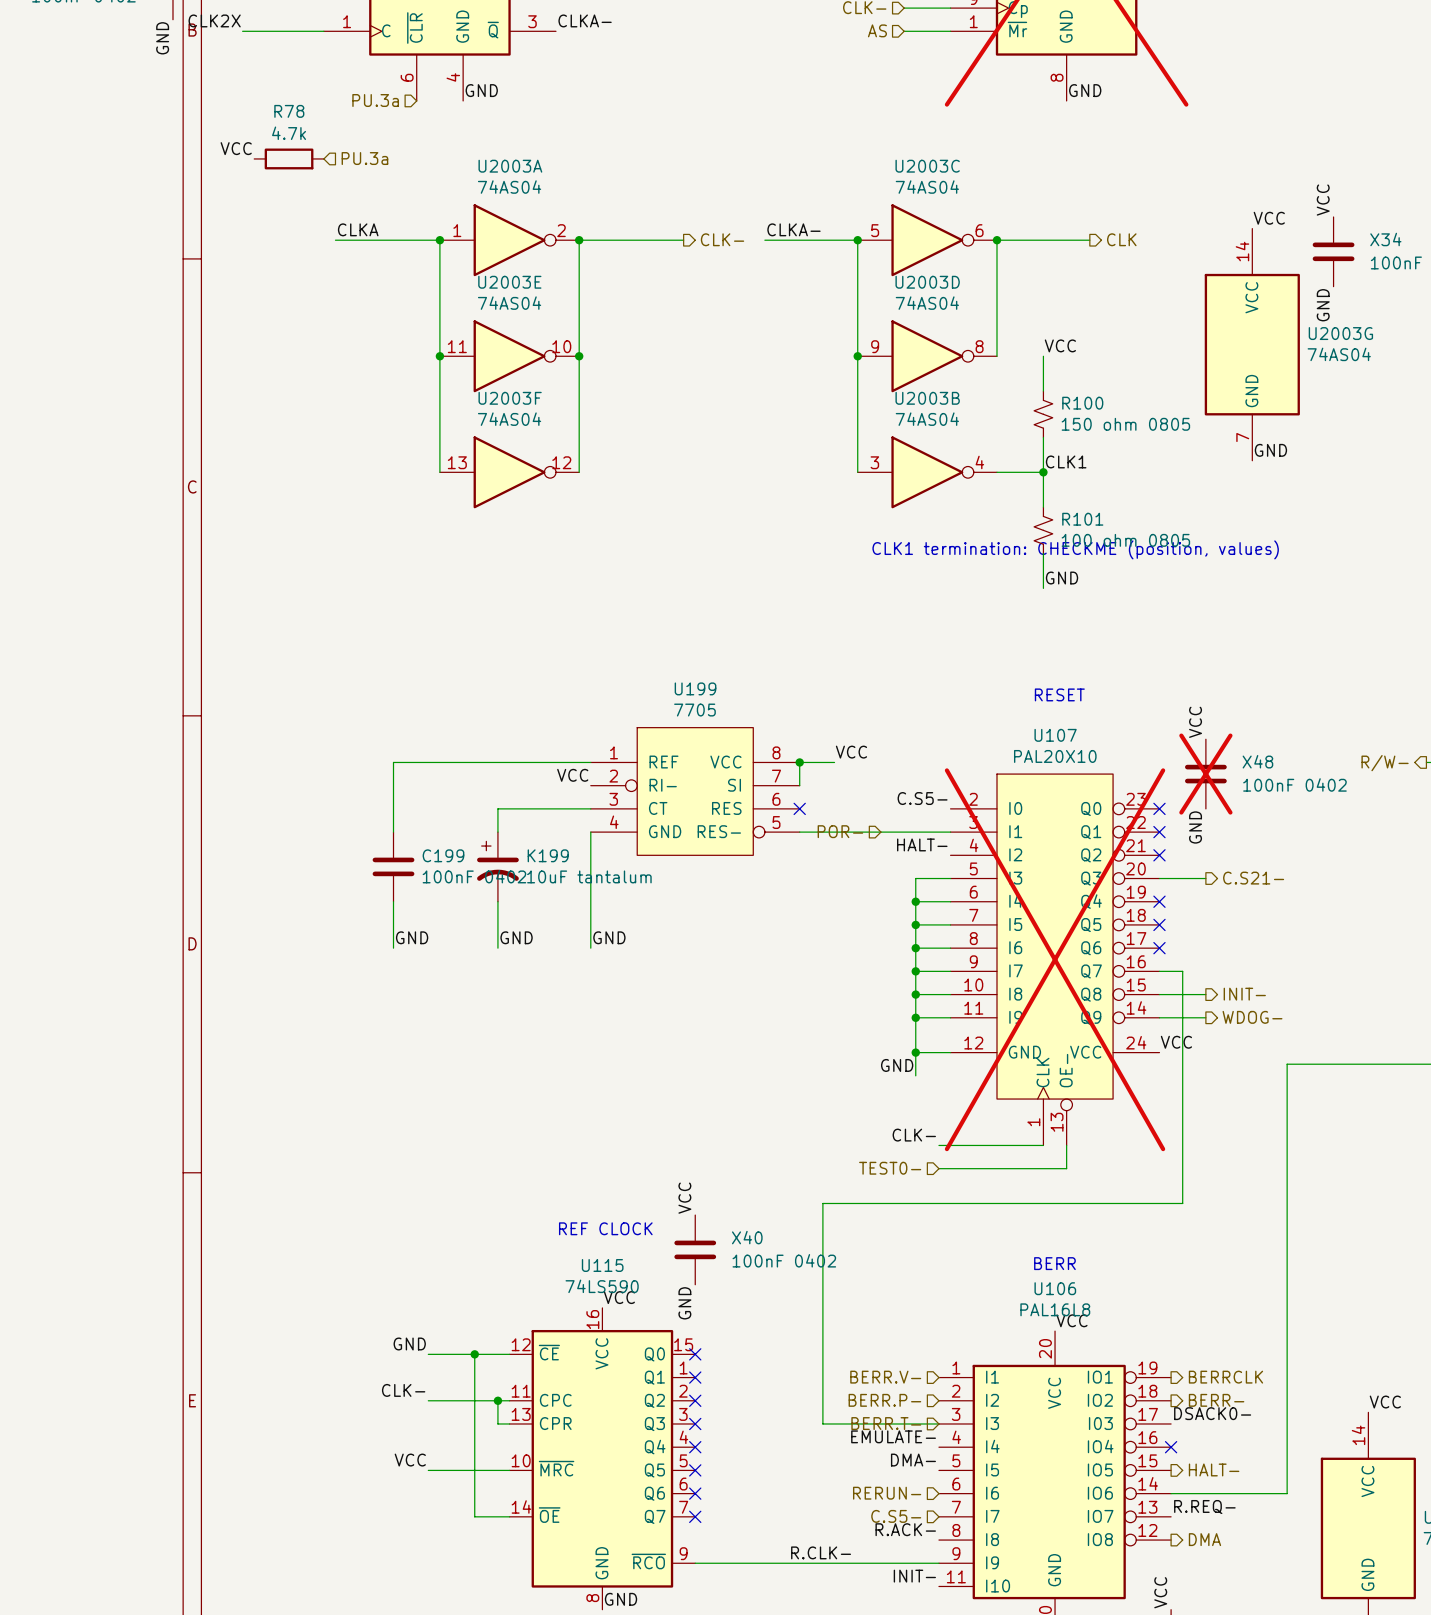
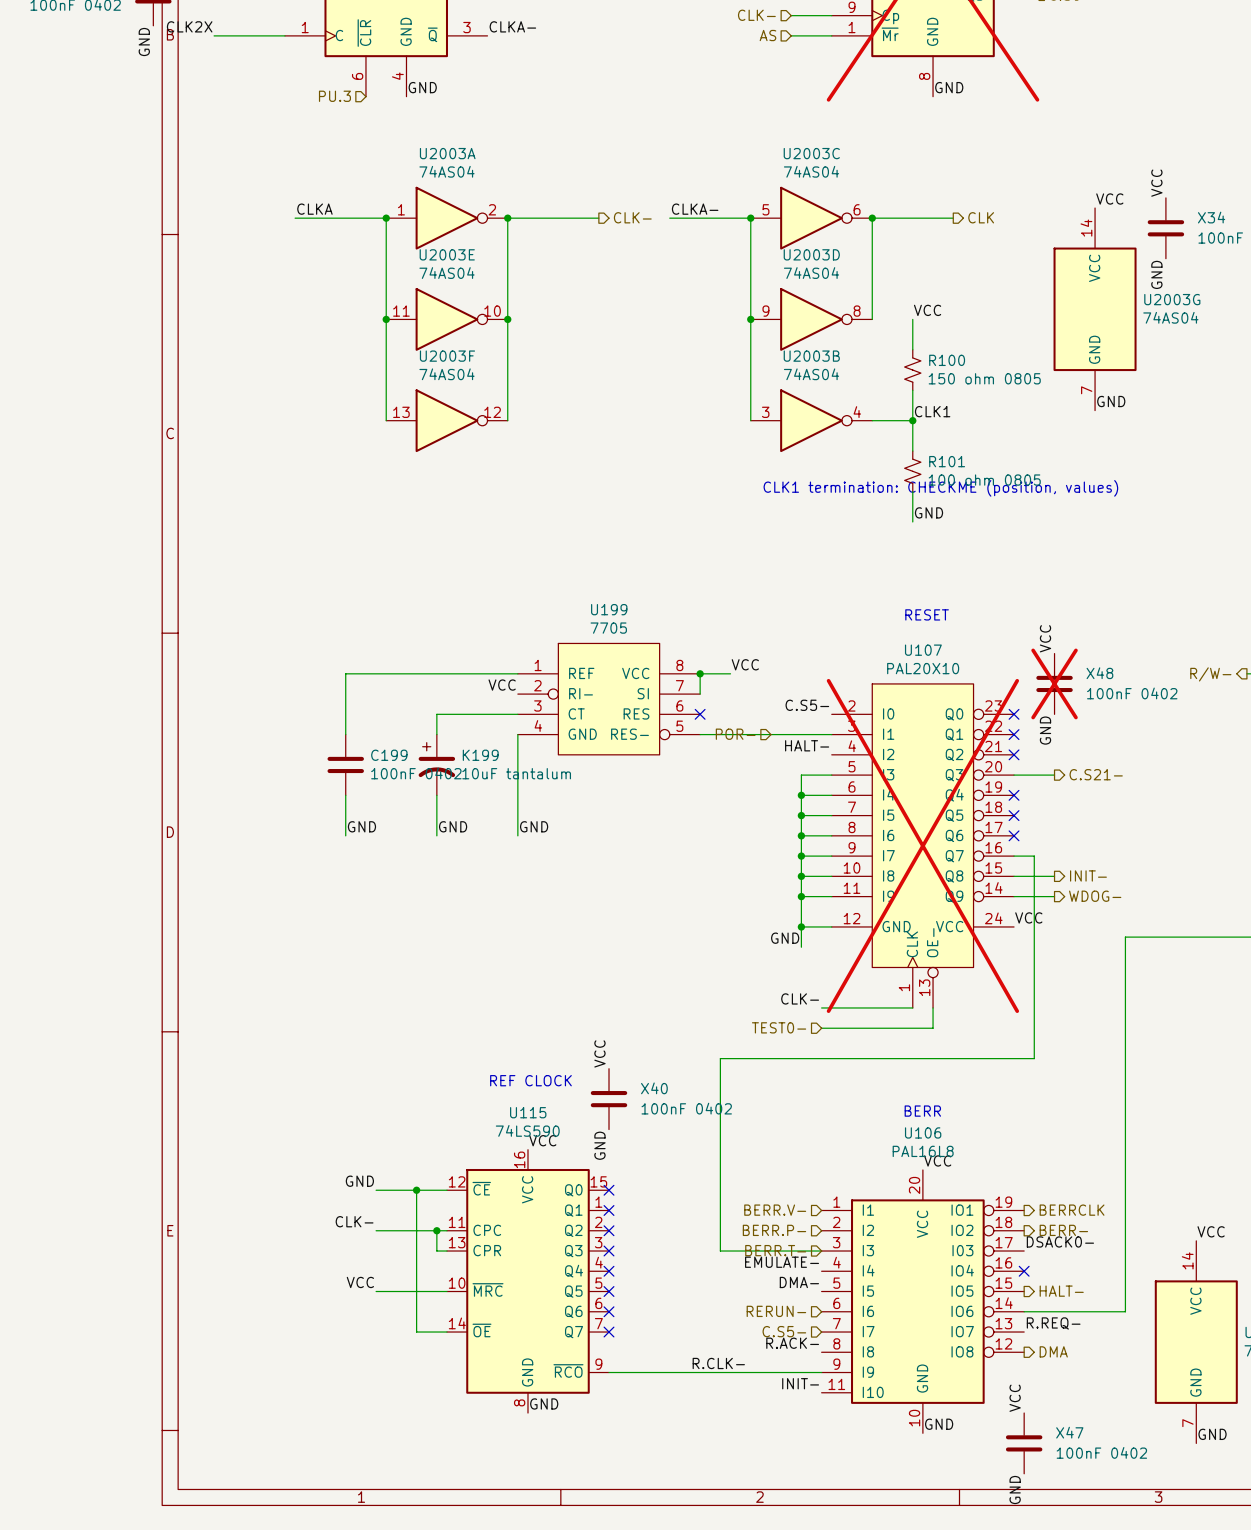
hierarchical label: PU.3a (375, 100) -> PU.3 (334, 96)
label: VCC (236, 148) -> none
R78: 4.7k (289, 158) -> none
hierarchical label: PU.3a (364, 158) -> none

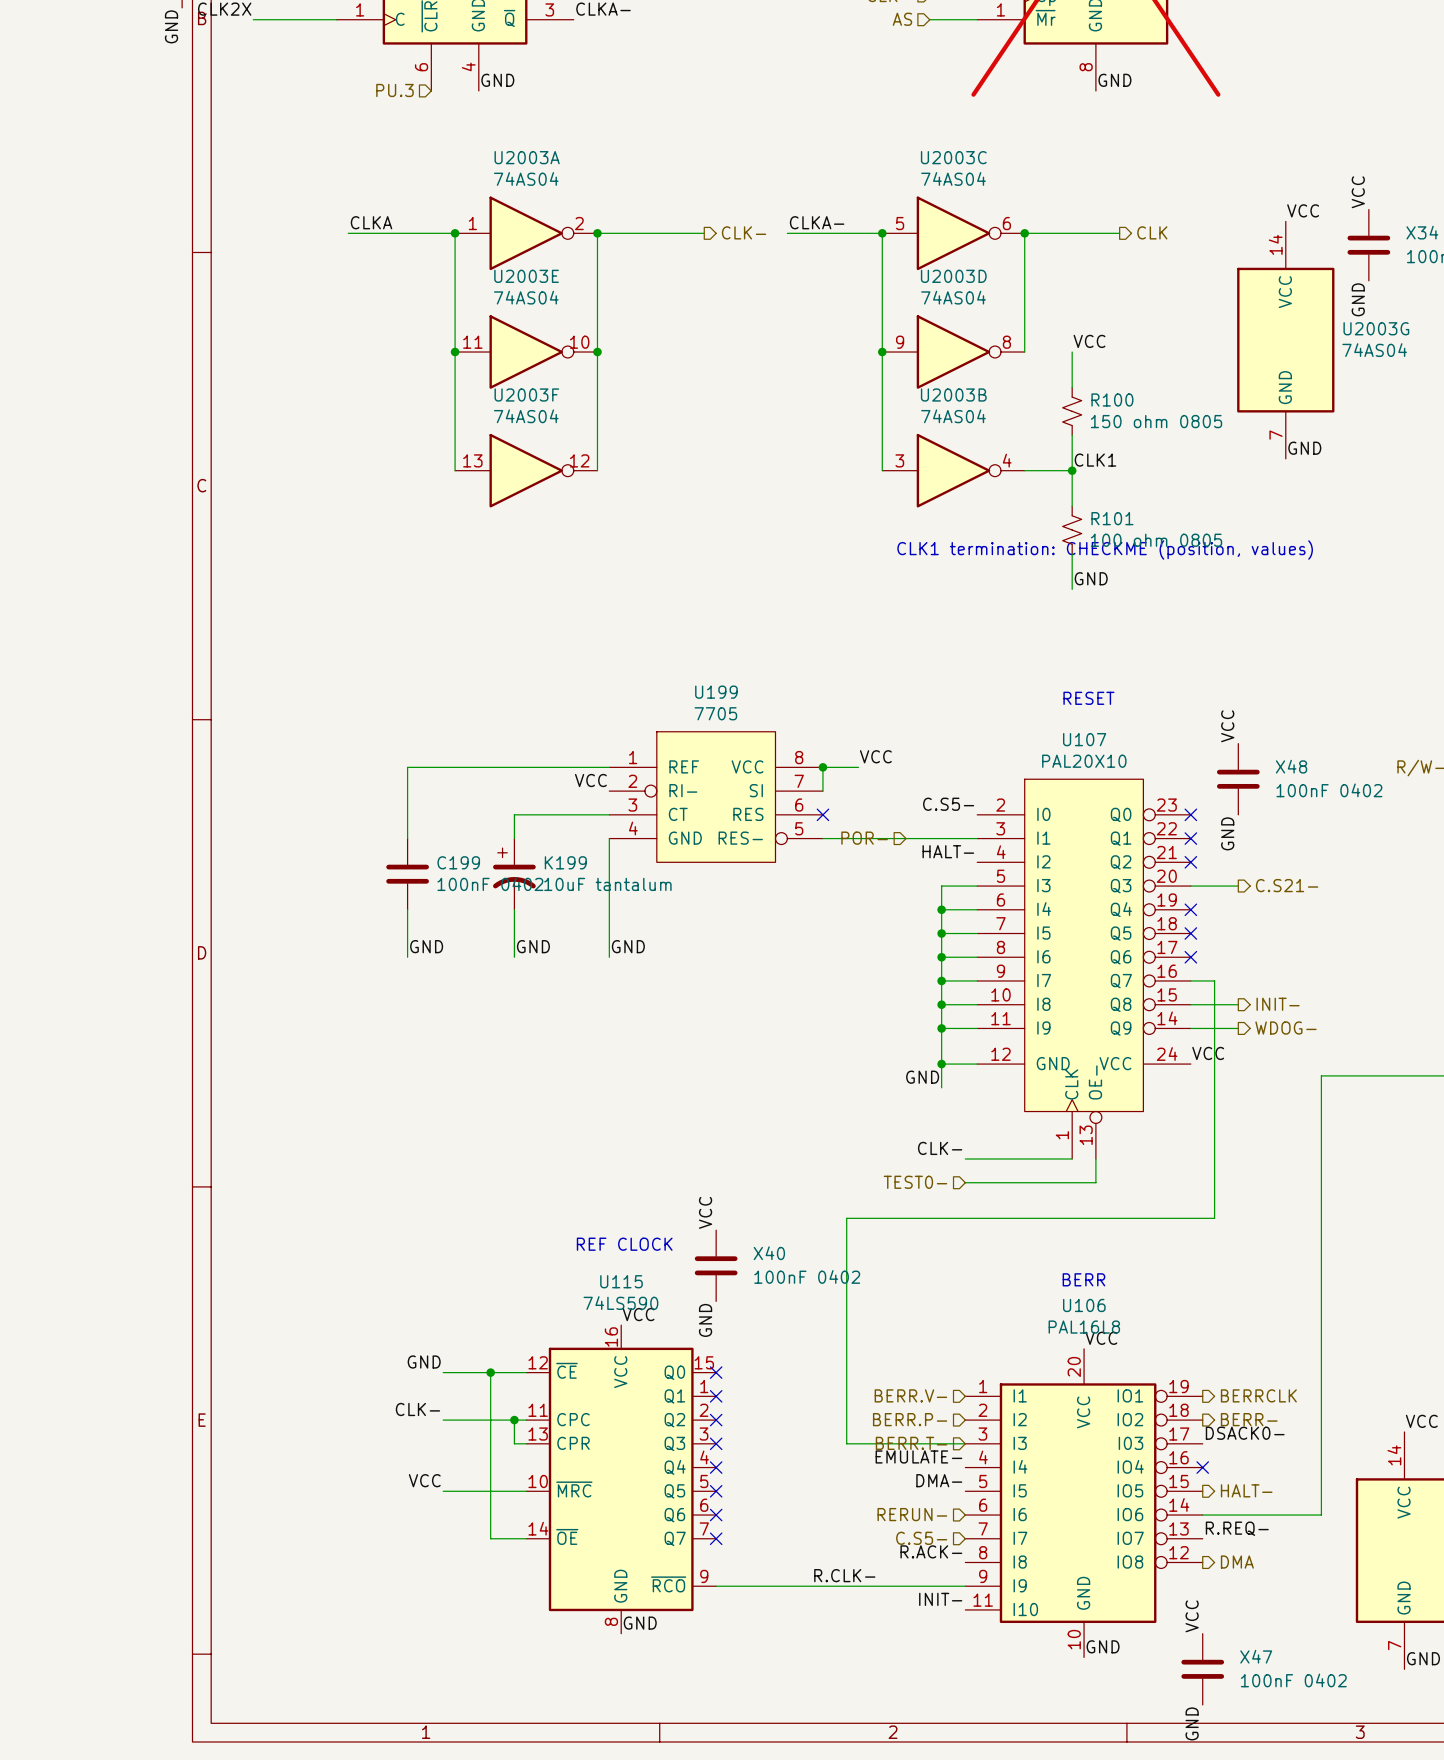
X48 do-not-place cross: (1054, 683) -> none
U107 do-not-place cross: (922, 845) -> none

